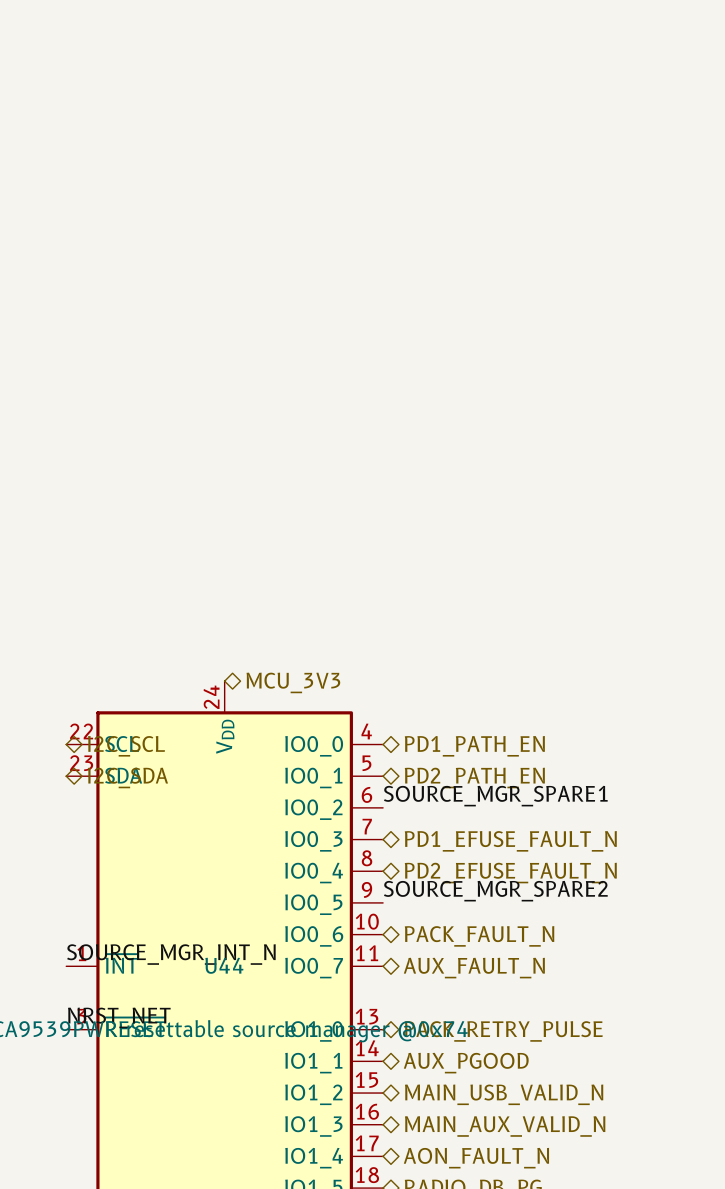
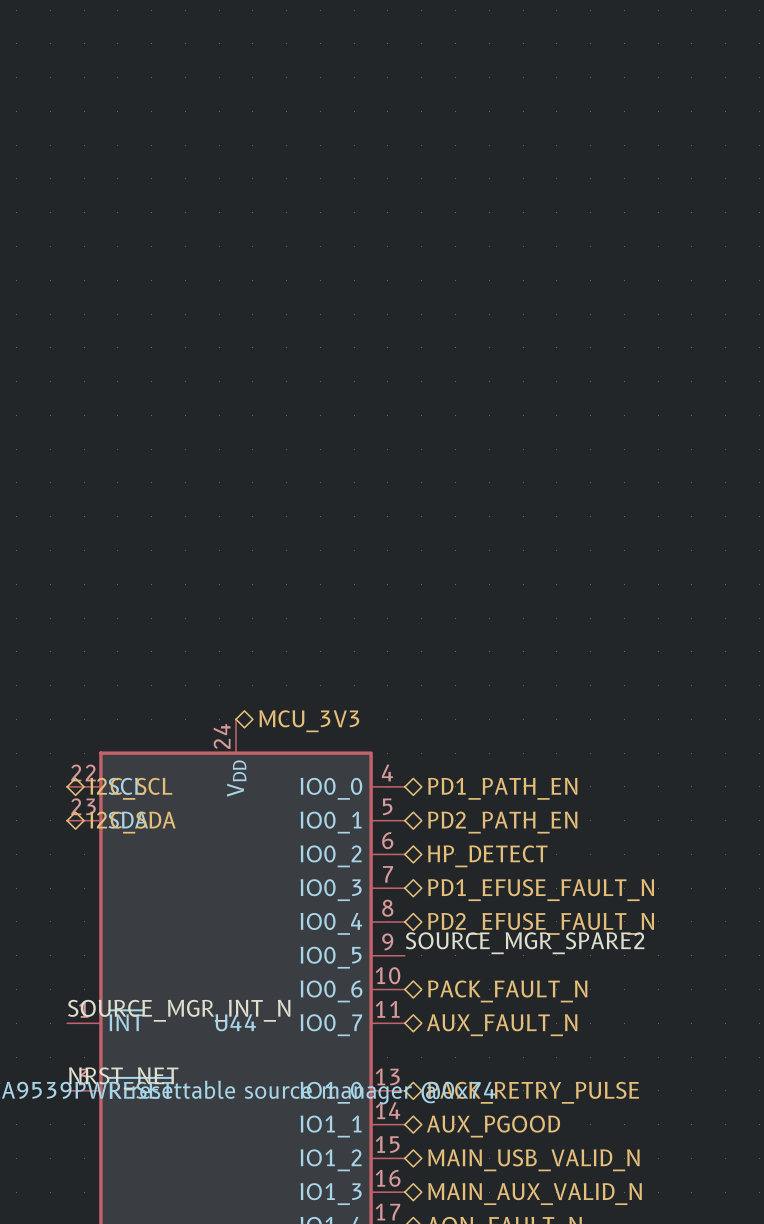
label: SOURCE_MGR_SPARE1 (495, 796) -> none
hierarchical label: none -> HP_DETECT (487, 856)

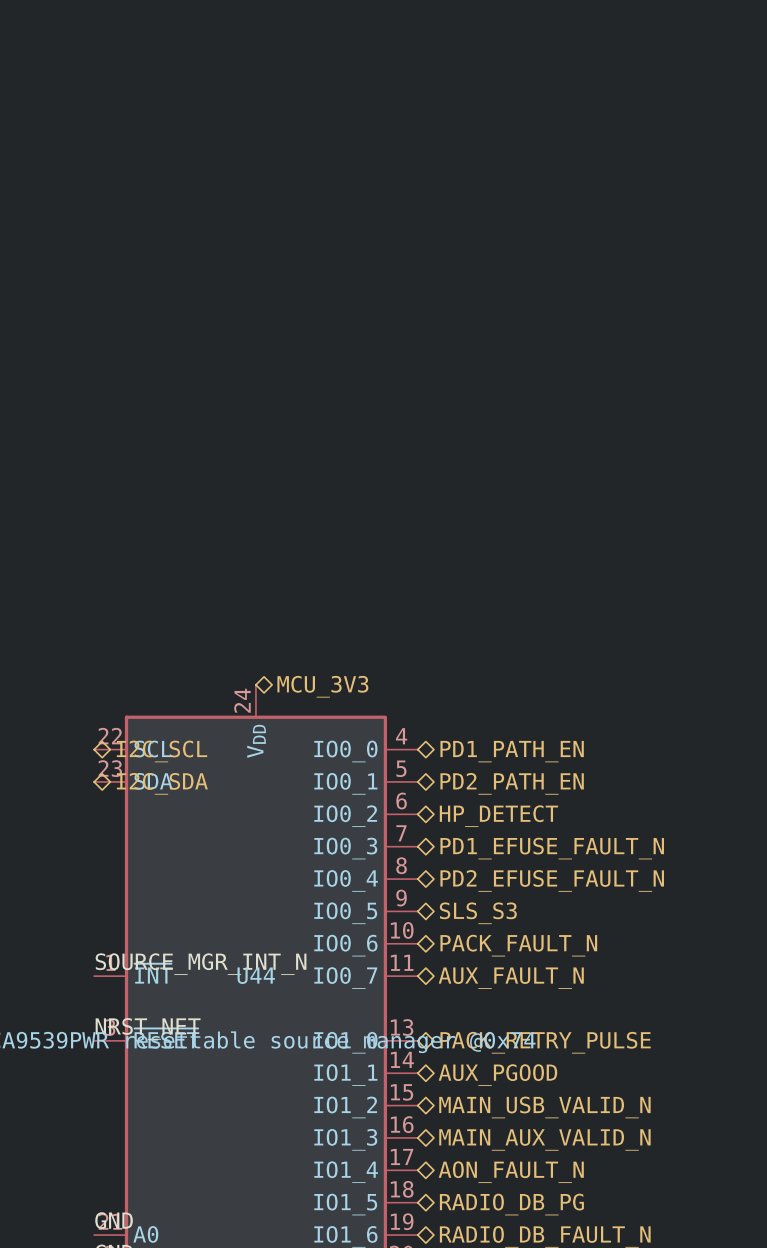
label: SOURCE_MGR_SPARE2 (525, 943) -> none
hierarchical label: none -> SLS_S3 (478, 913)

